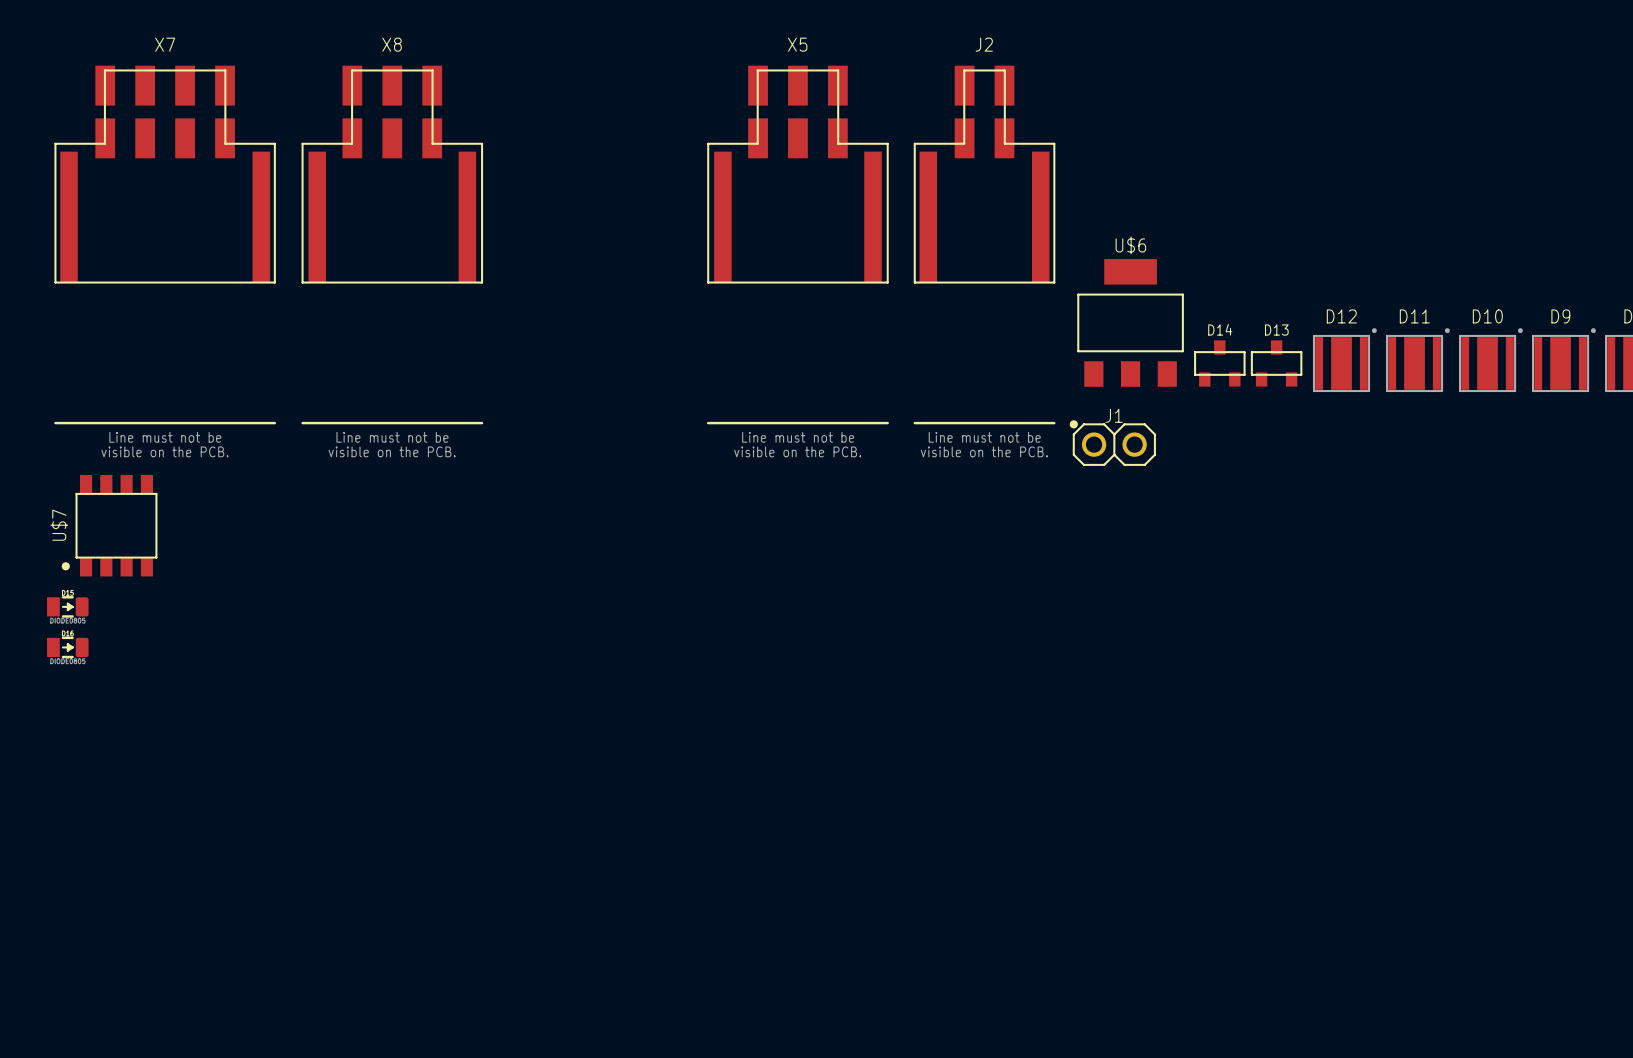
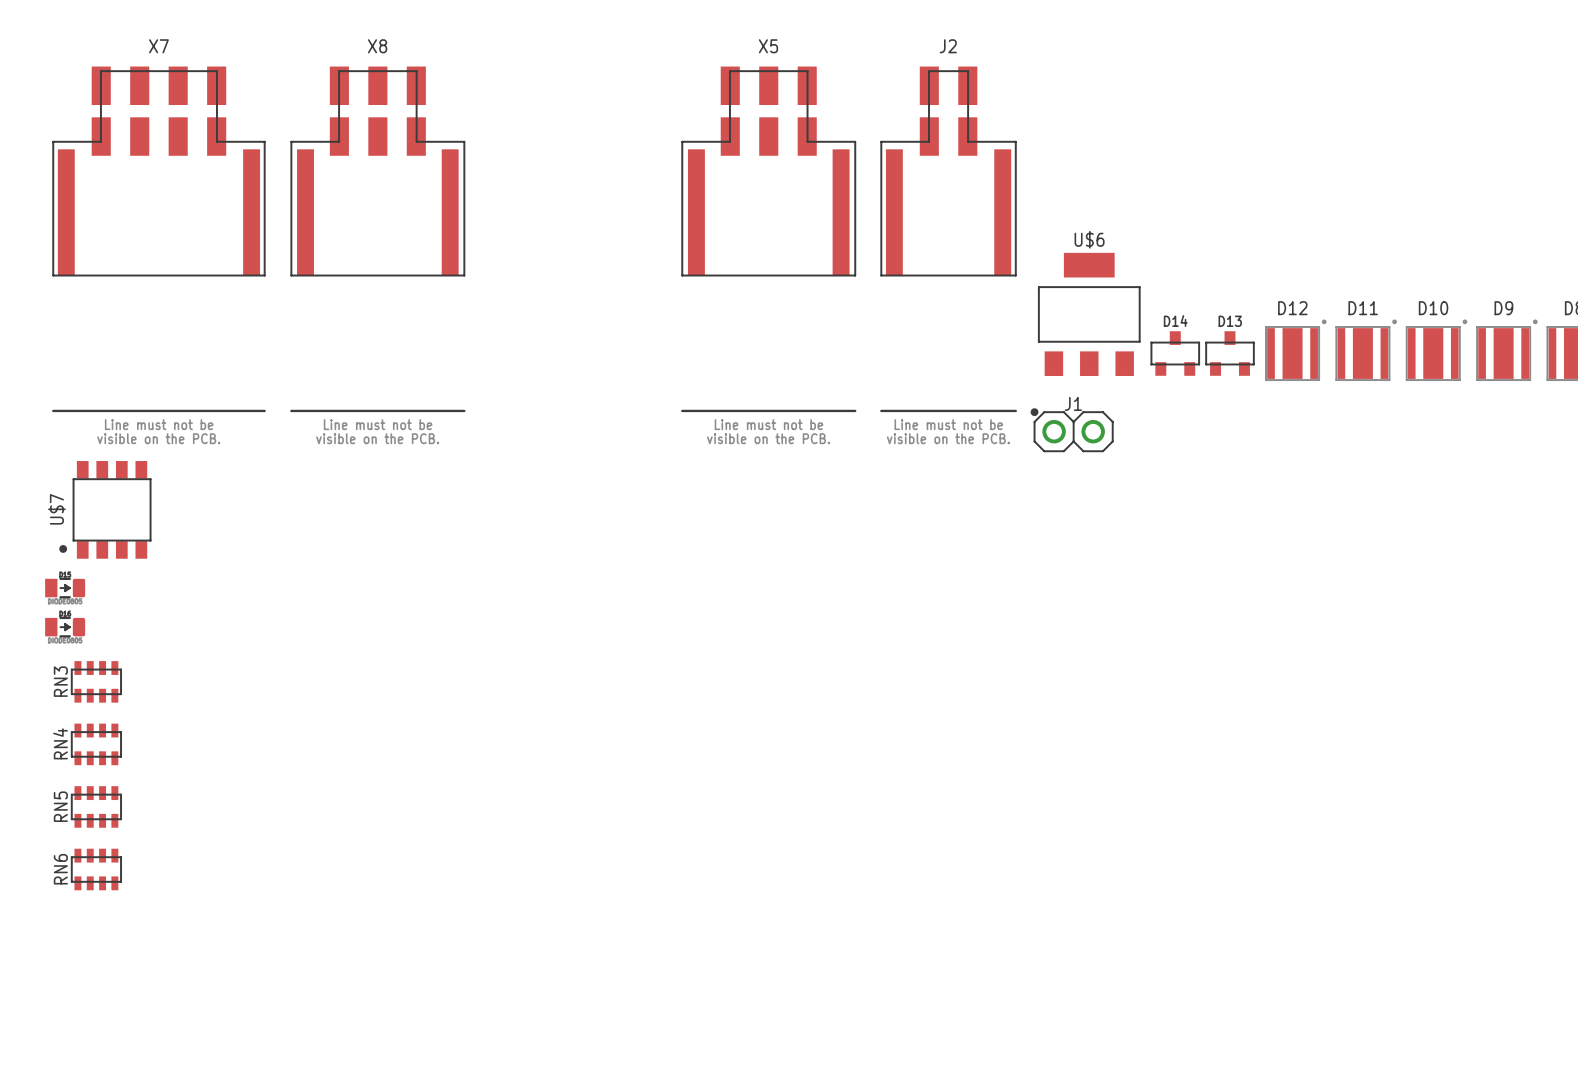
RN3: none -> (96, 681)
RN4: none -> (96, 744)
RN5: none -> (96, 806)
RN6: none -> (96, 869)

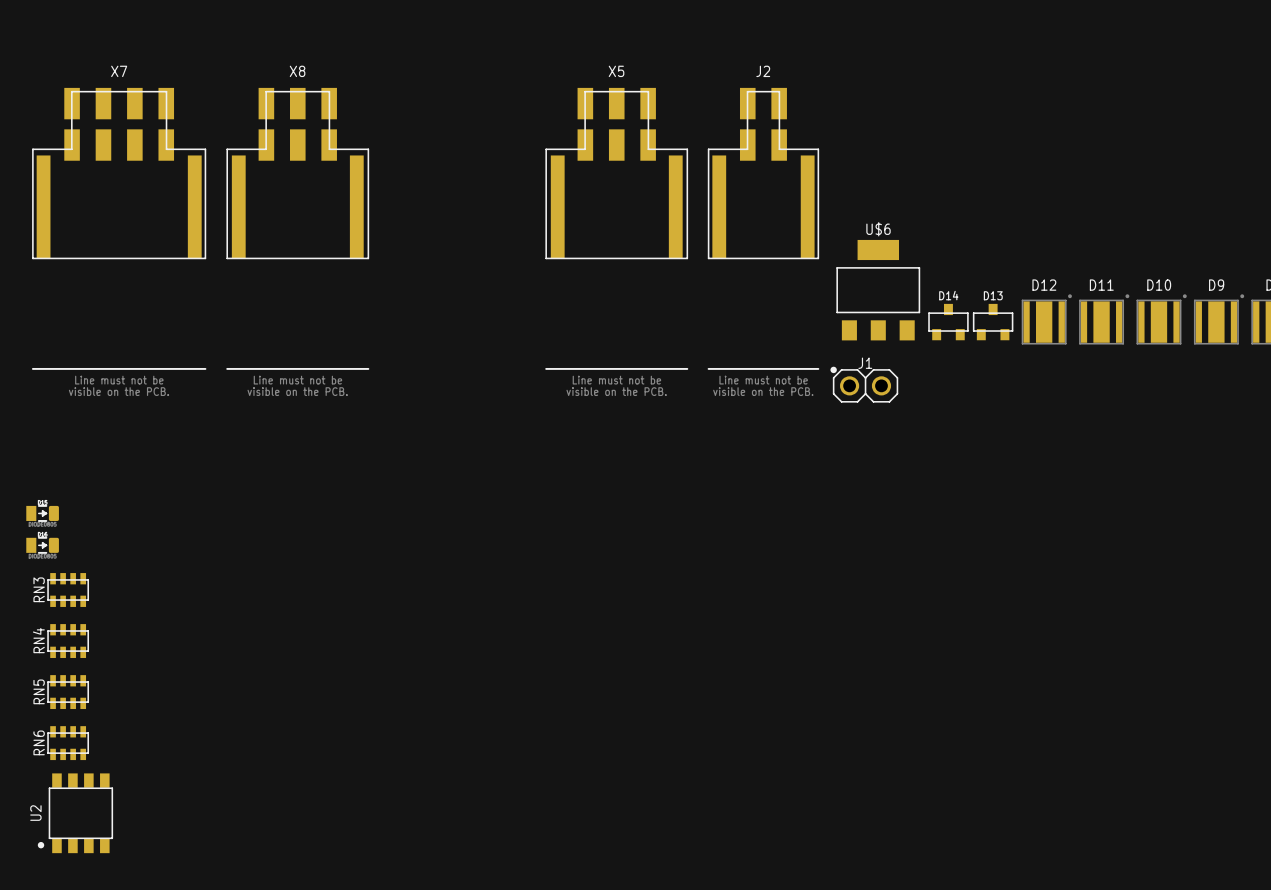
U$7: (105, 509) -> none
U2: none -> (75, 813)

